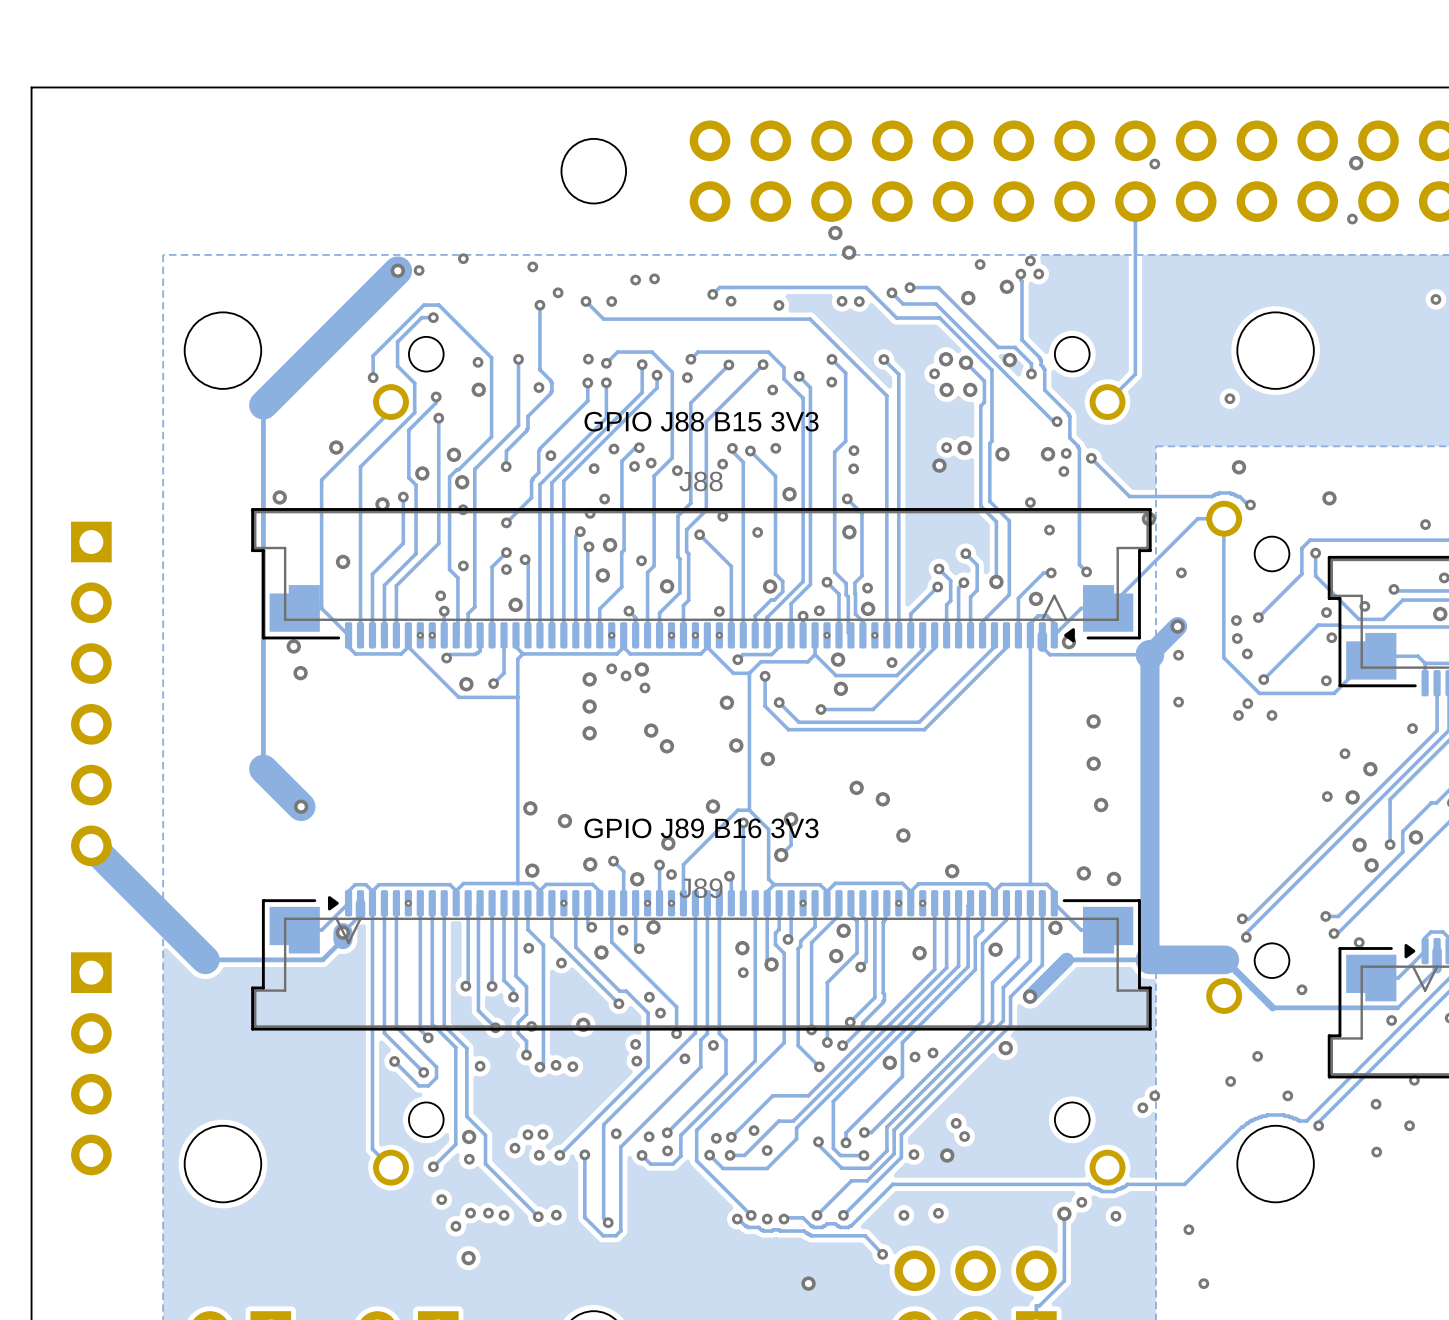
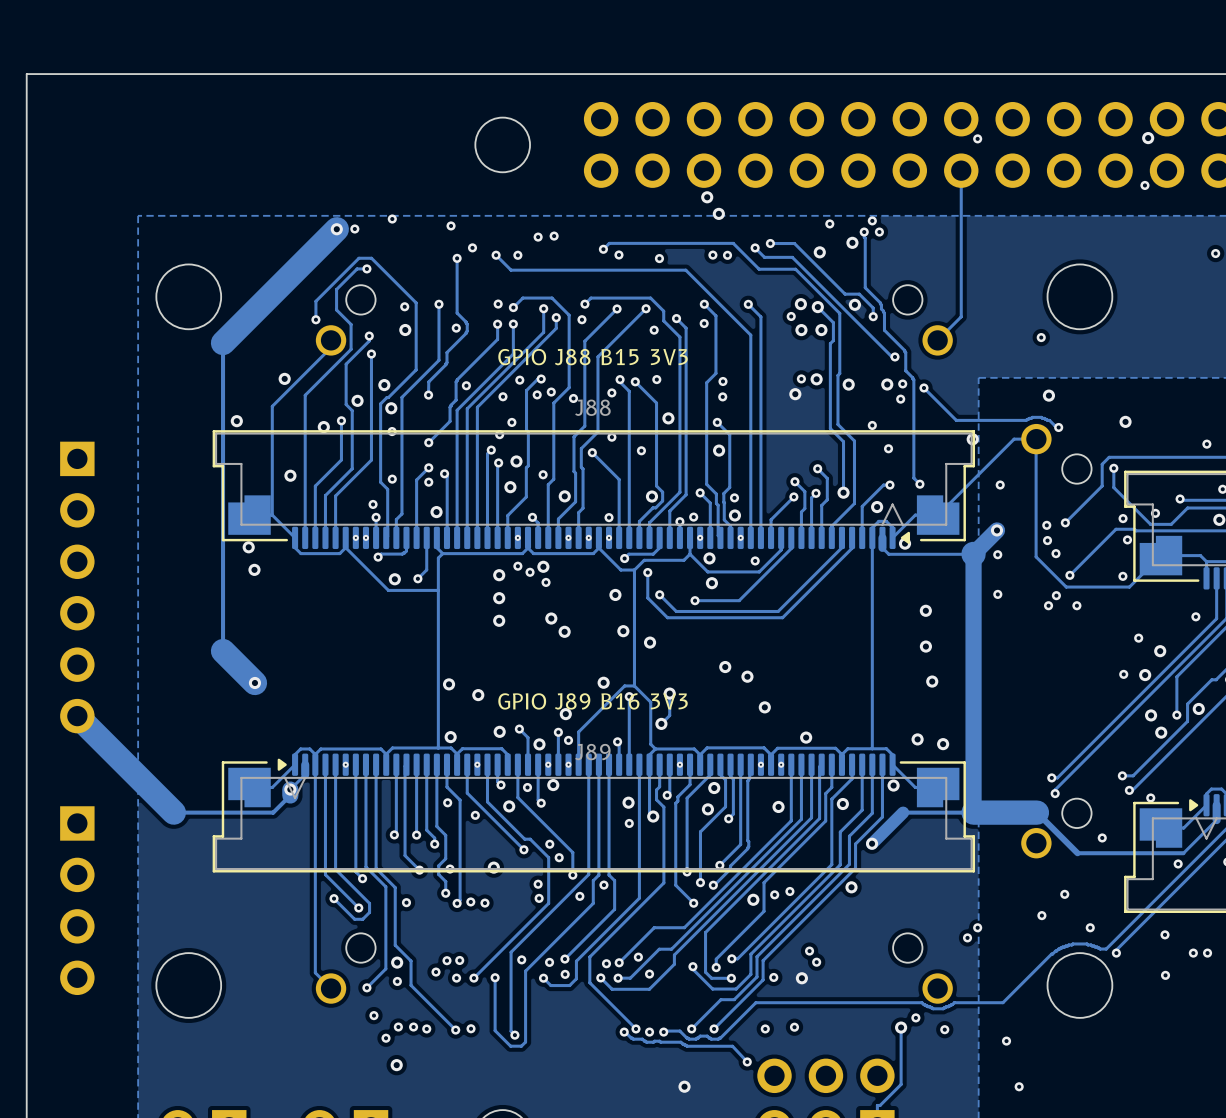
via: (1414, 1080) -> none
via: none -> (1207, 953)

